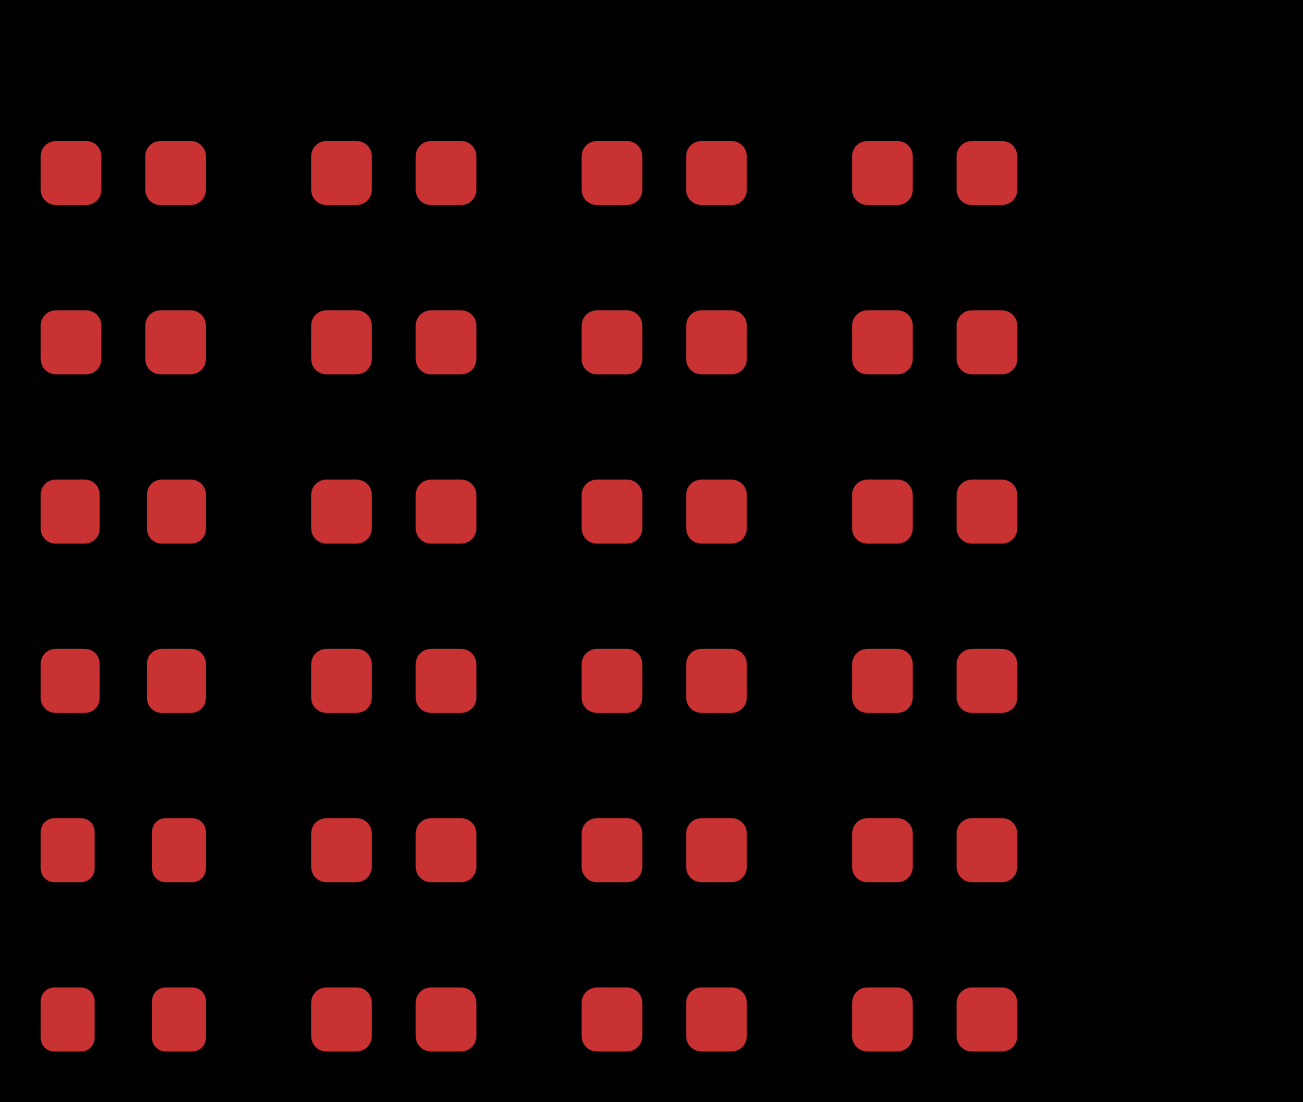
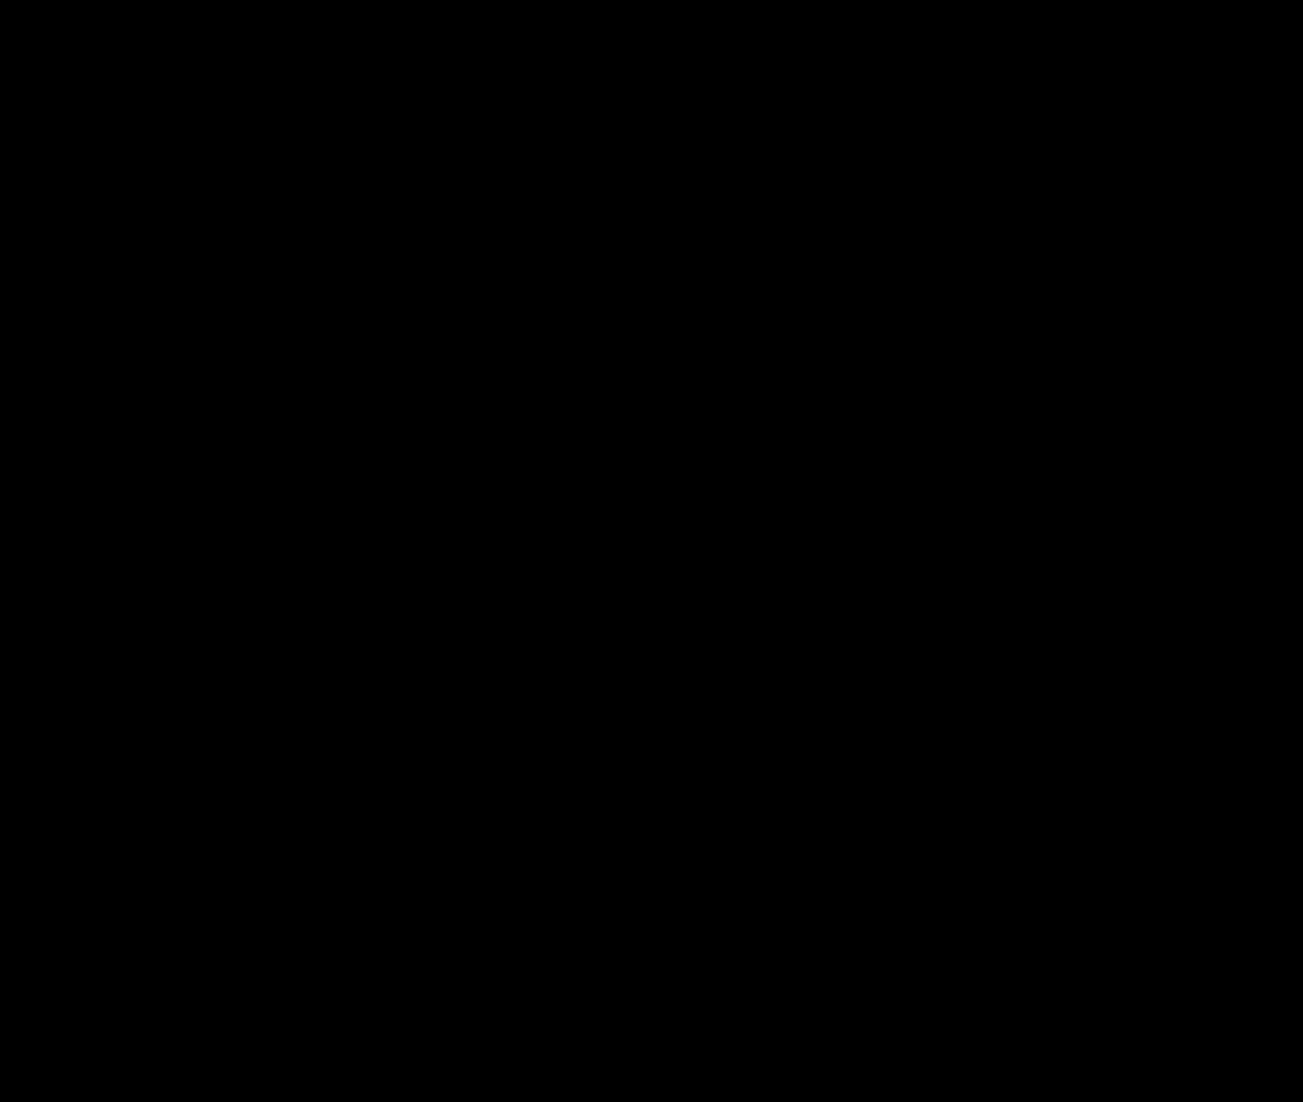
part: (123, 173) -> none
part: (393, 173) -> none
part: (664, 173) -> none
part: (934, 173) -> none
part: (123, 342) -> none
part: (393, 342) -> none
part: (664, 342) -> none
part: (934, 342) -> none
part: (123, 511) -> none
part: (393, 511) -> none
part: (664, 511) -> none
part: (934, 511) -> none
part: (123, 680) -> none
part: (393, 680) -> none
part: (664, 680) -> none
part: (934, 680) -> none
part: (123, 850) -> none
part: (393, 850) -> none
part: (664, 850) -> none
part: (934, 850) -> none
part: (123, 1019) -> none
part: (393, 1019) -> none
part: (664, 1019) -> none
part: (934, 1019) -> none

